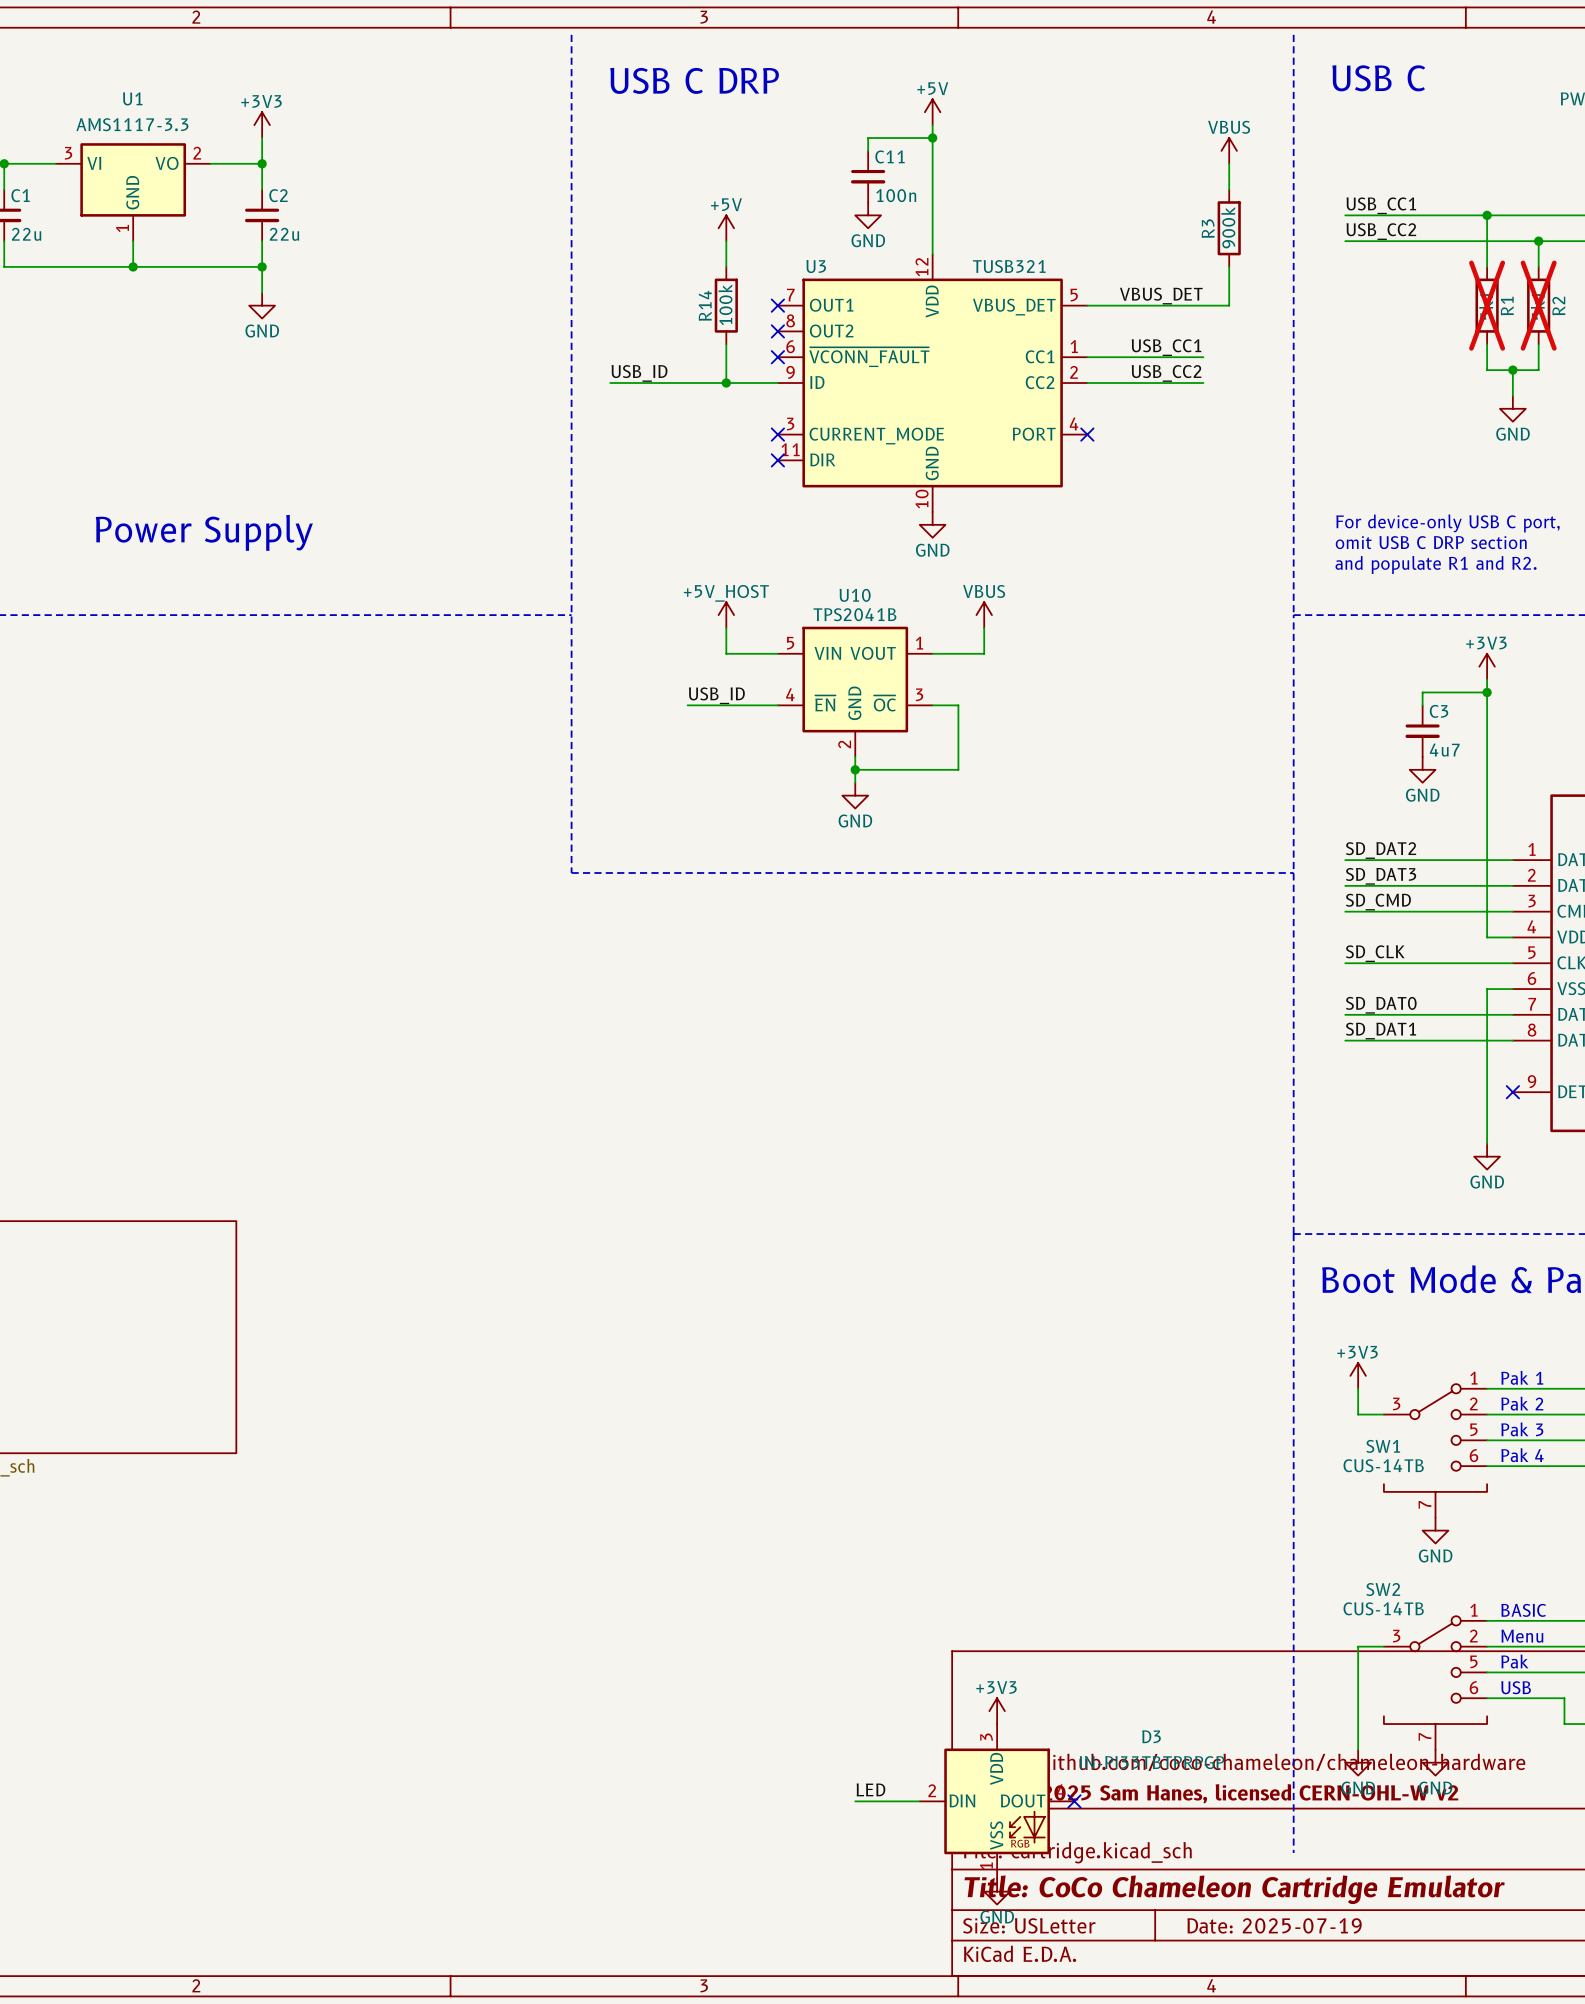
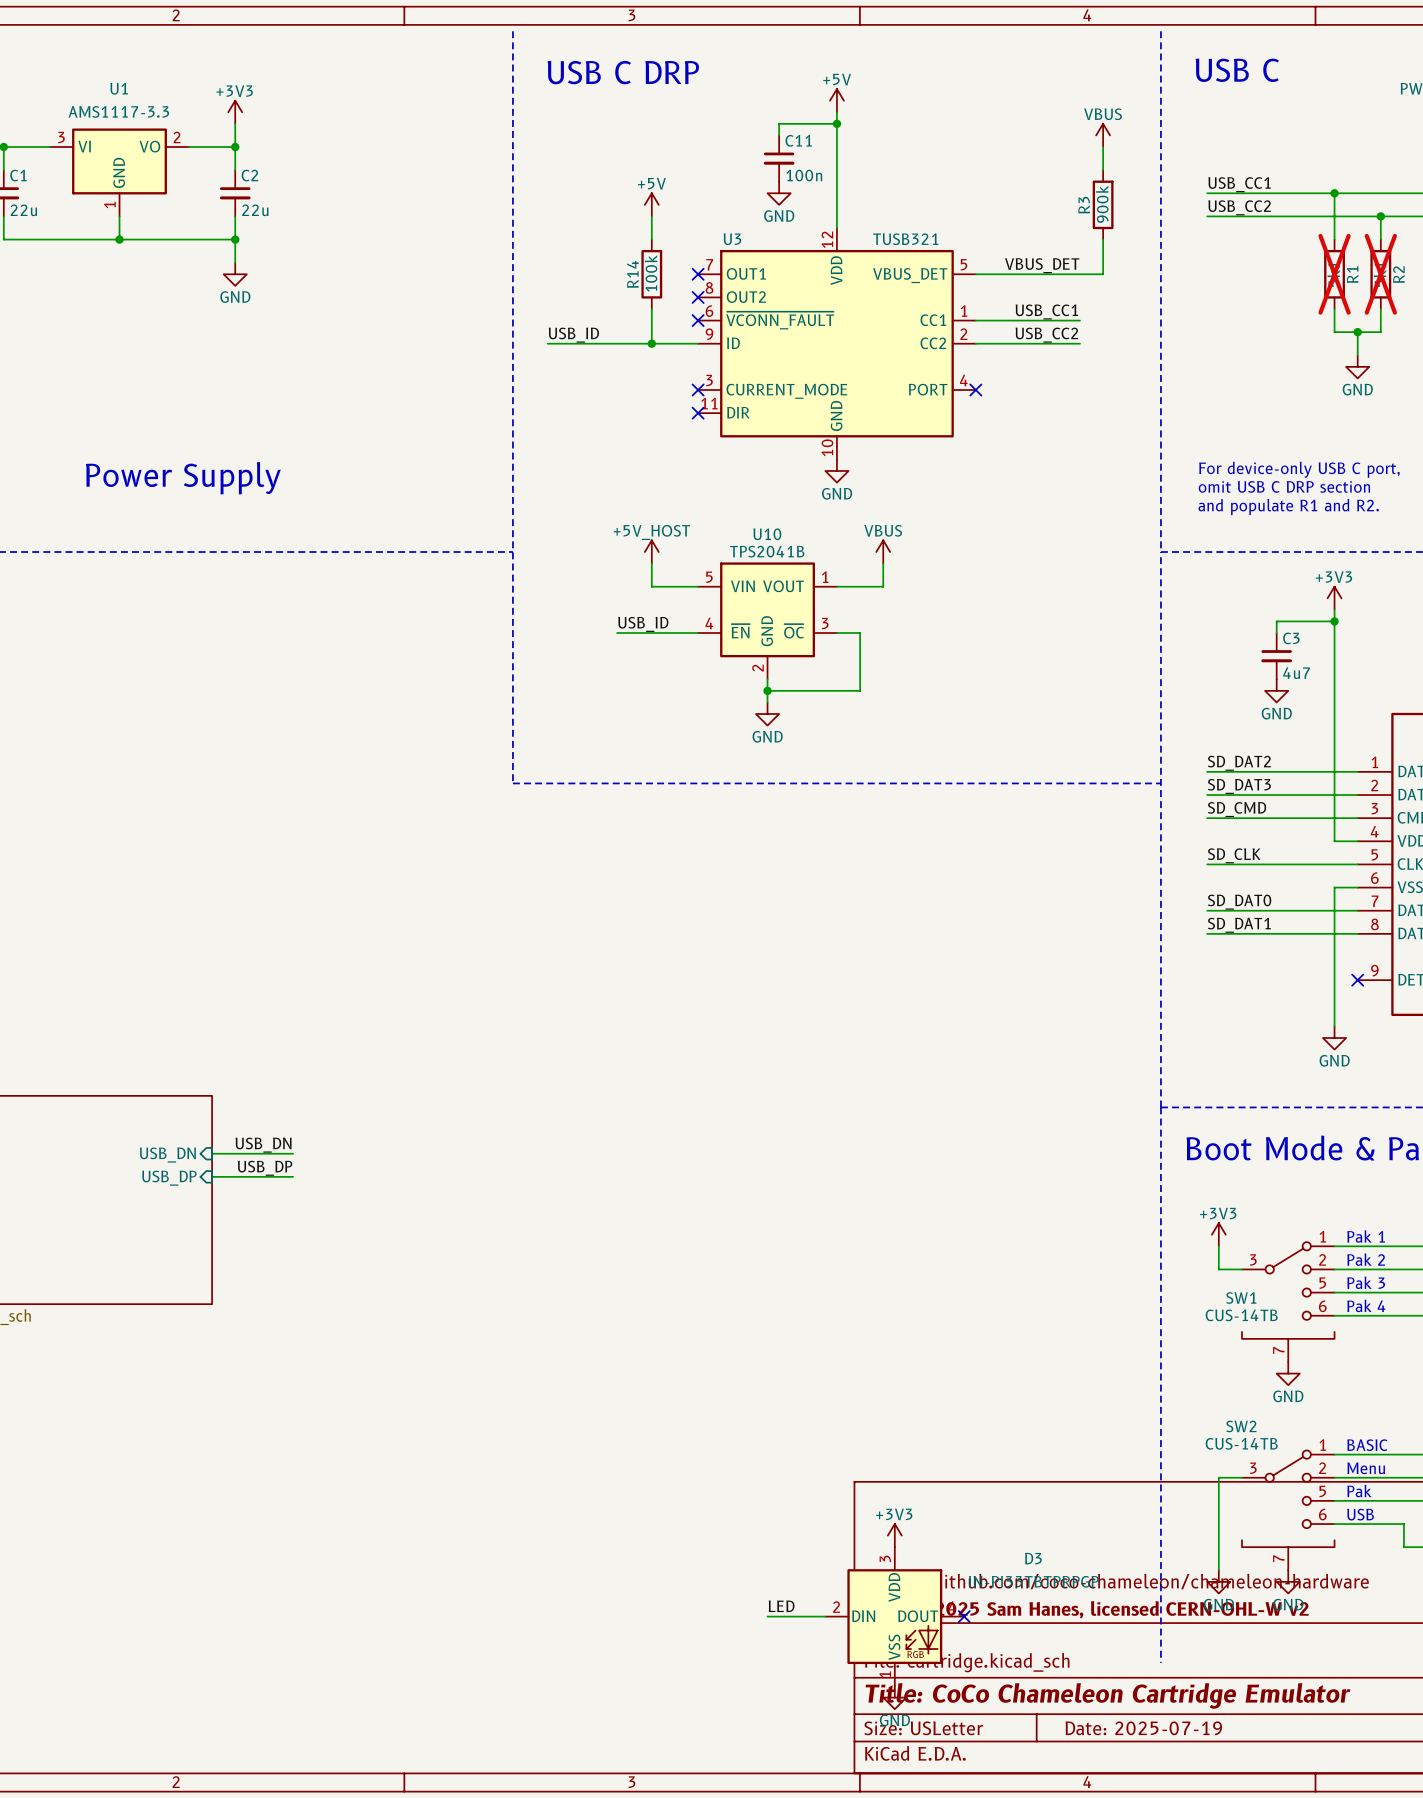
label: none -> USB_DN (263, 1145)
wire: none -> (212, 1153) (293, 1153)
sheet pin: none -> USB_DN (167, 1155)
label: none -> USB_DP (265, 1168)
wire: none -> (212, 1176) (293, 1176)
sheet pin: none -> USB_DP (169, 1178)

